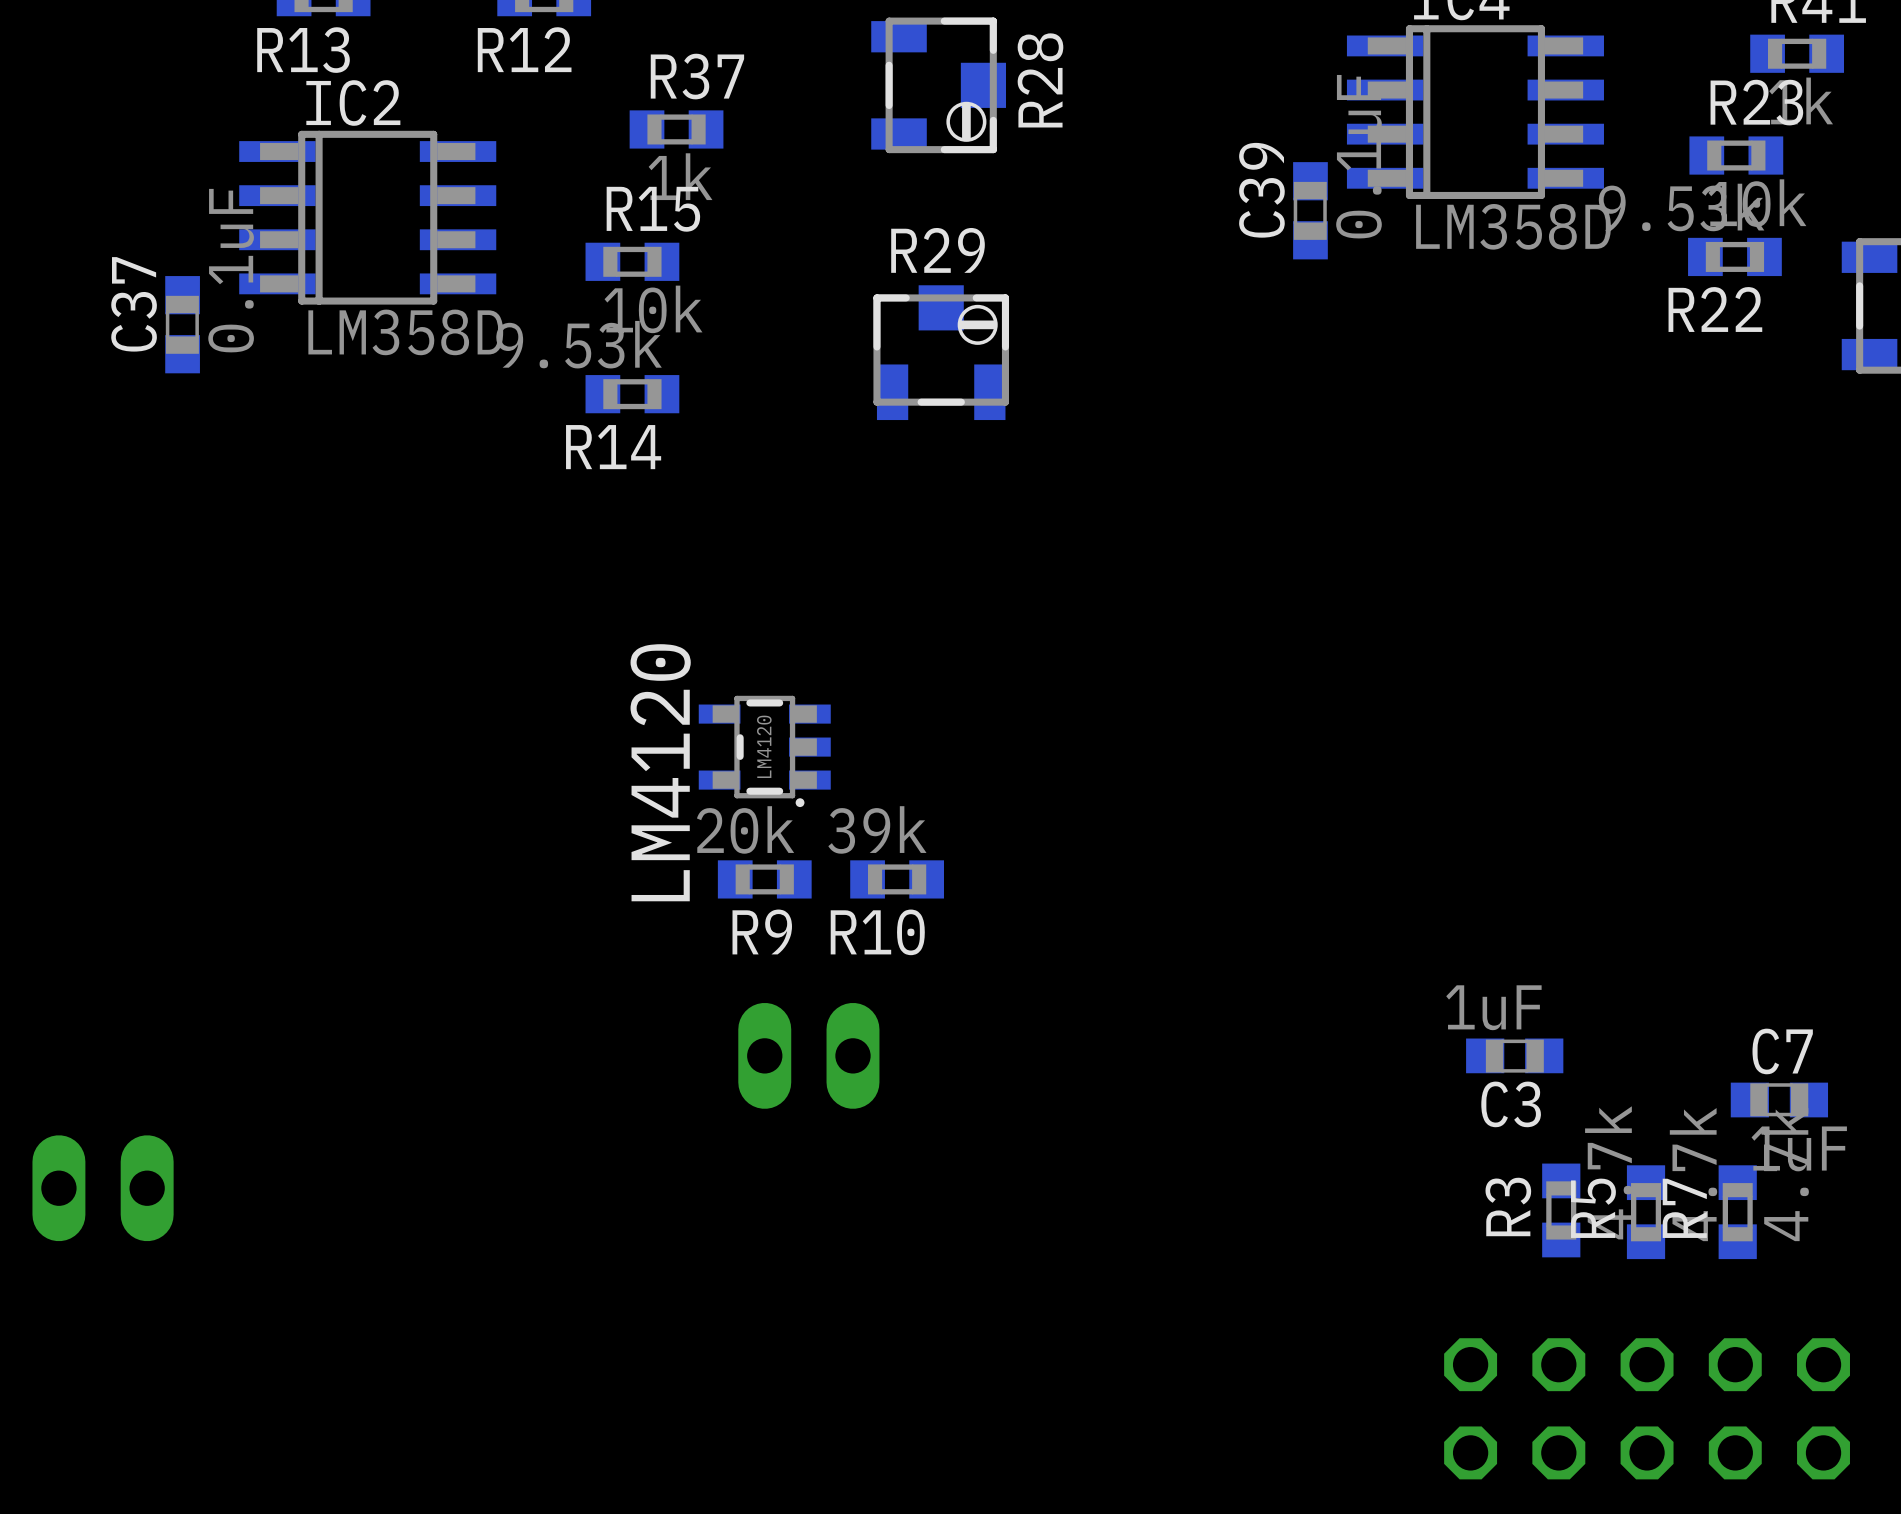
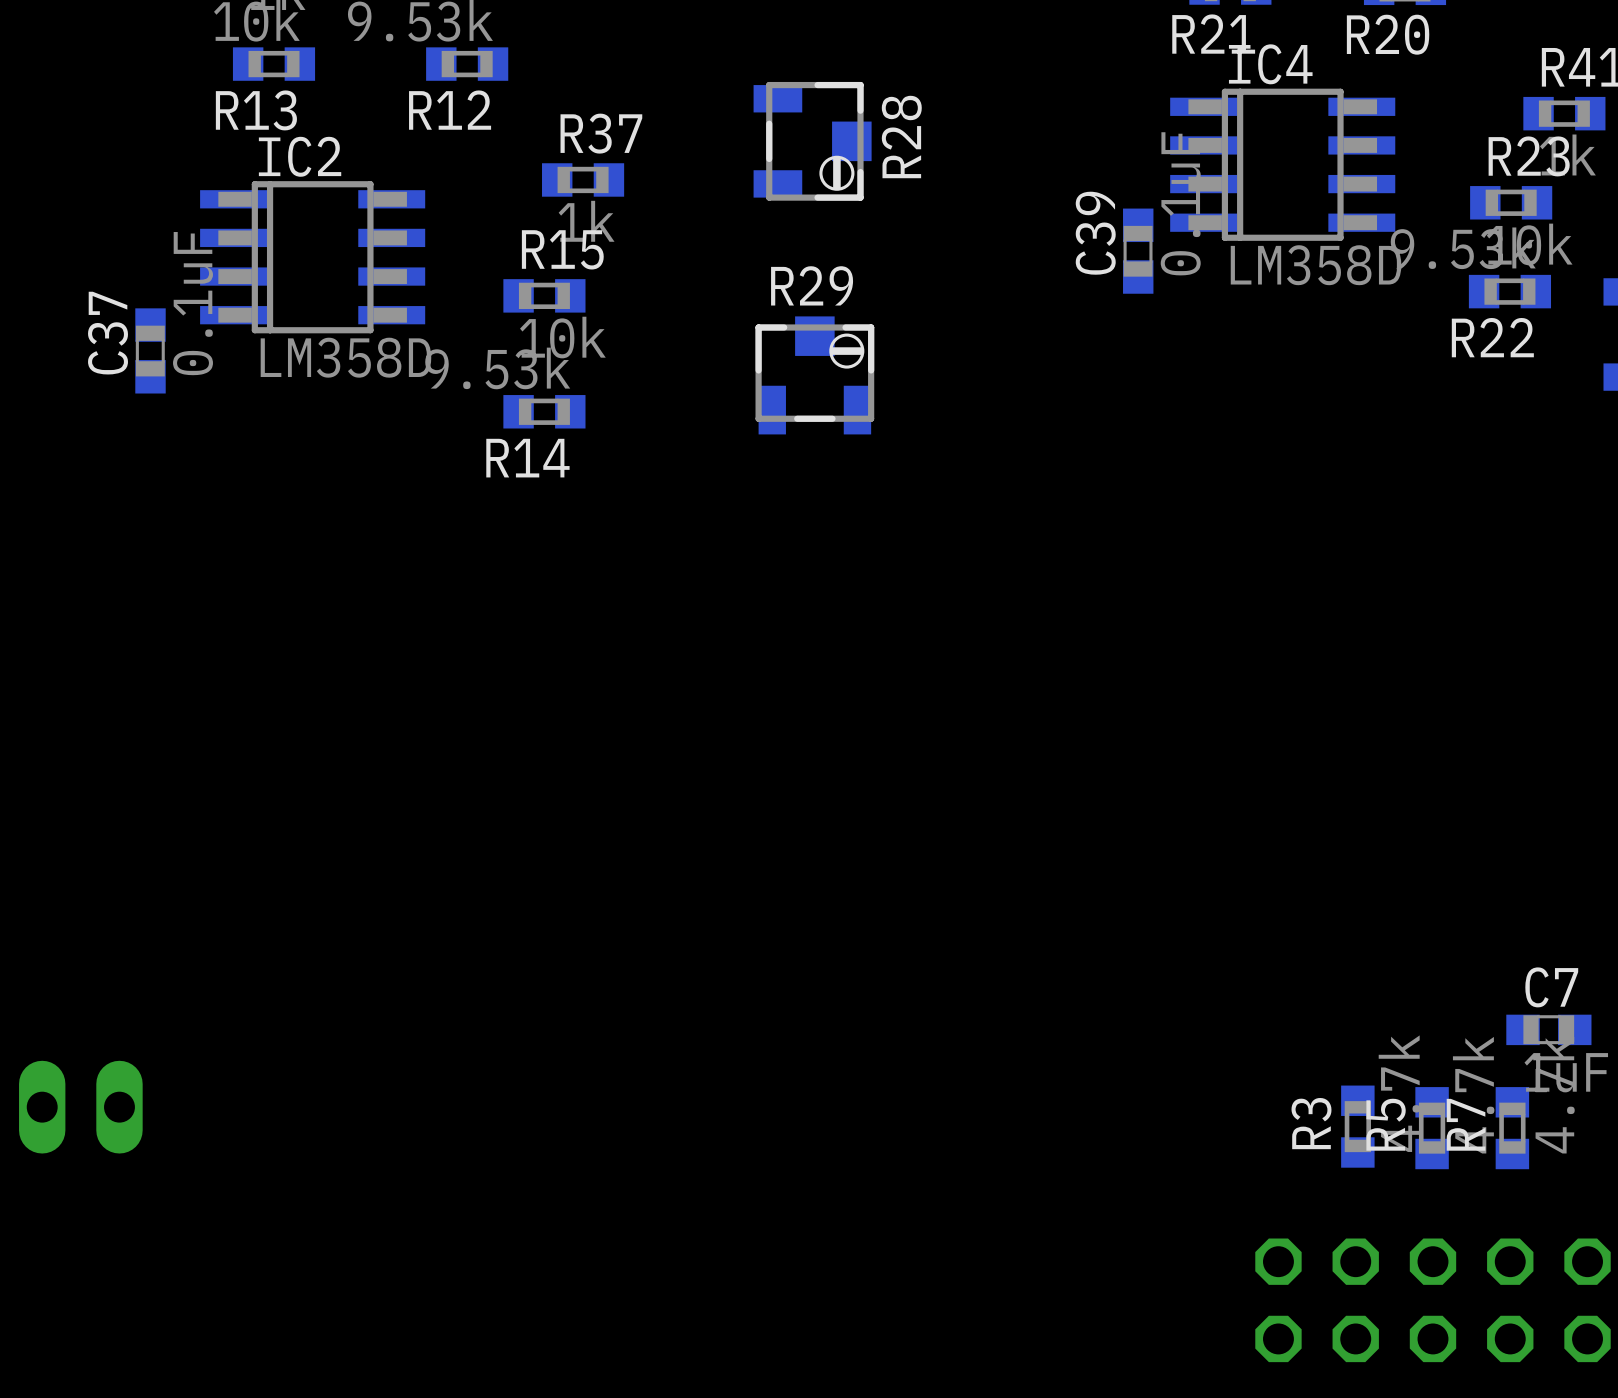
LM4120: LM4120 (764, 751) -> none
R9: 20k (764, 879) -> none
R10: 39k (897, 879) -> none
part: (808, 1055) -> none
C3: 1uF (1514, 1055) -> none

